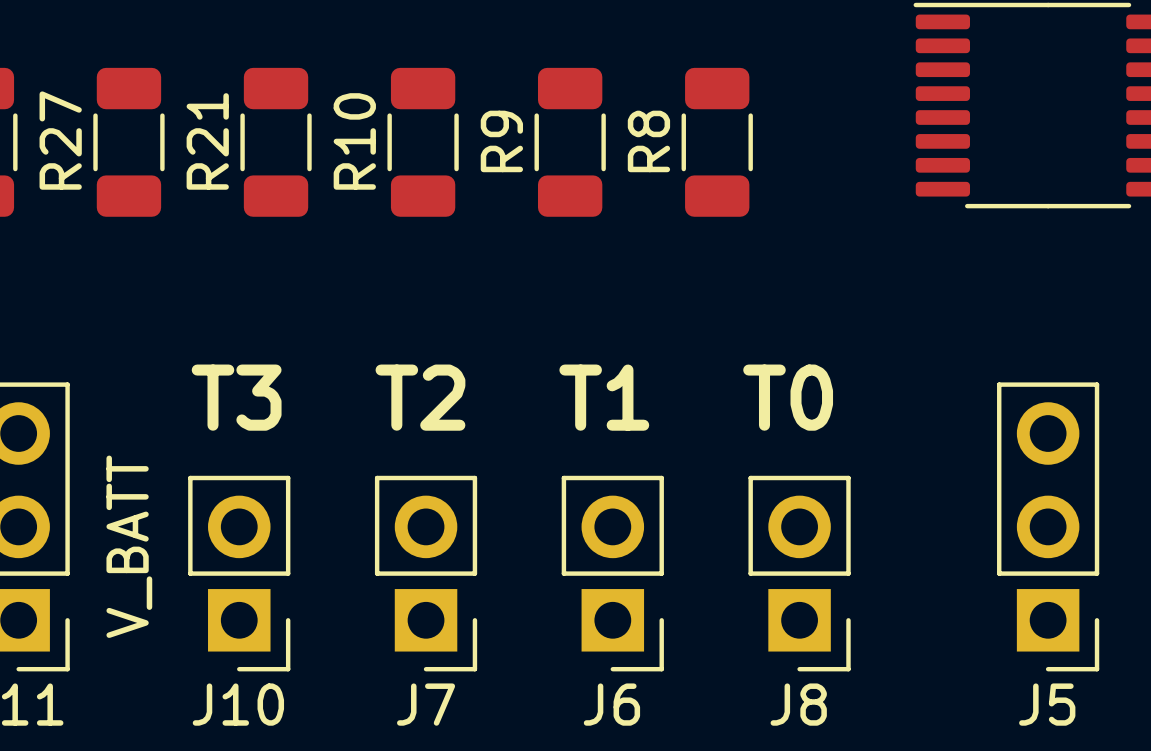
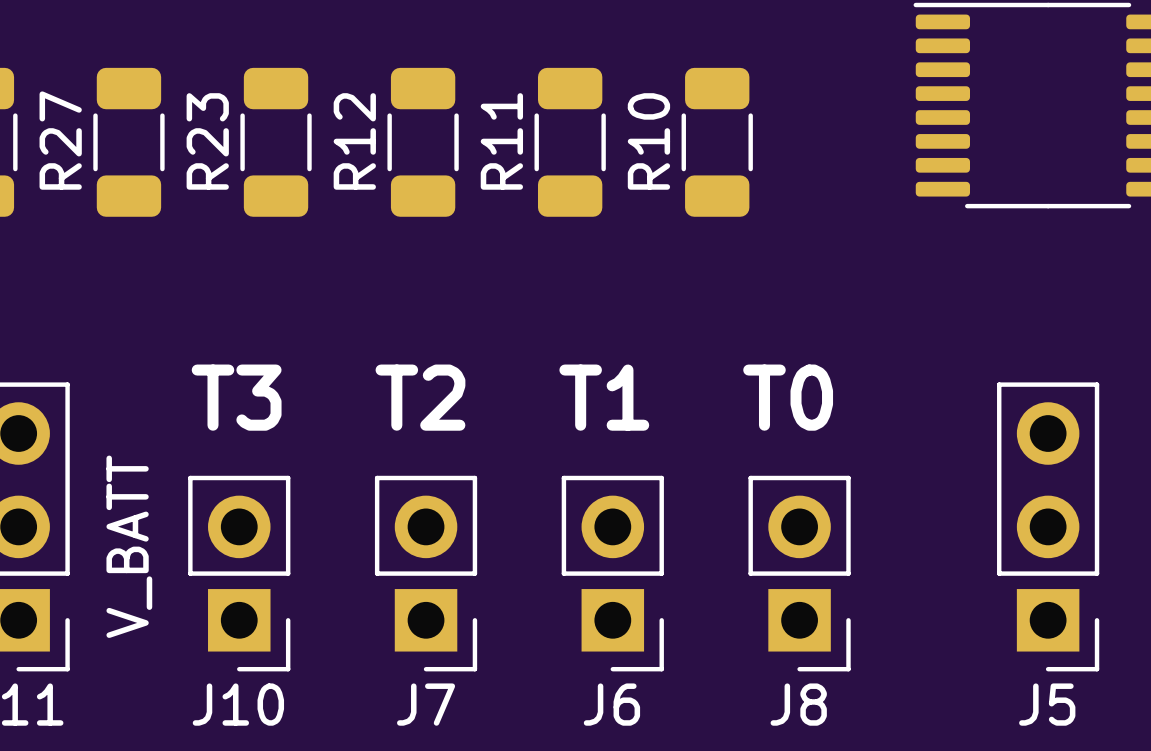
R21 name: R21 (207, 141) -> R23 (207, 141)
R10 name: R10 (354, 141) -> R12 (354, 141)
R9 name: R9 (501, 141) -> R11 (501, 141)
R8 name: R8 (648, 141) -> R10 (648, 141)

